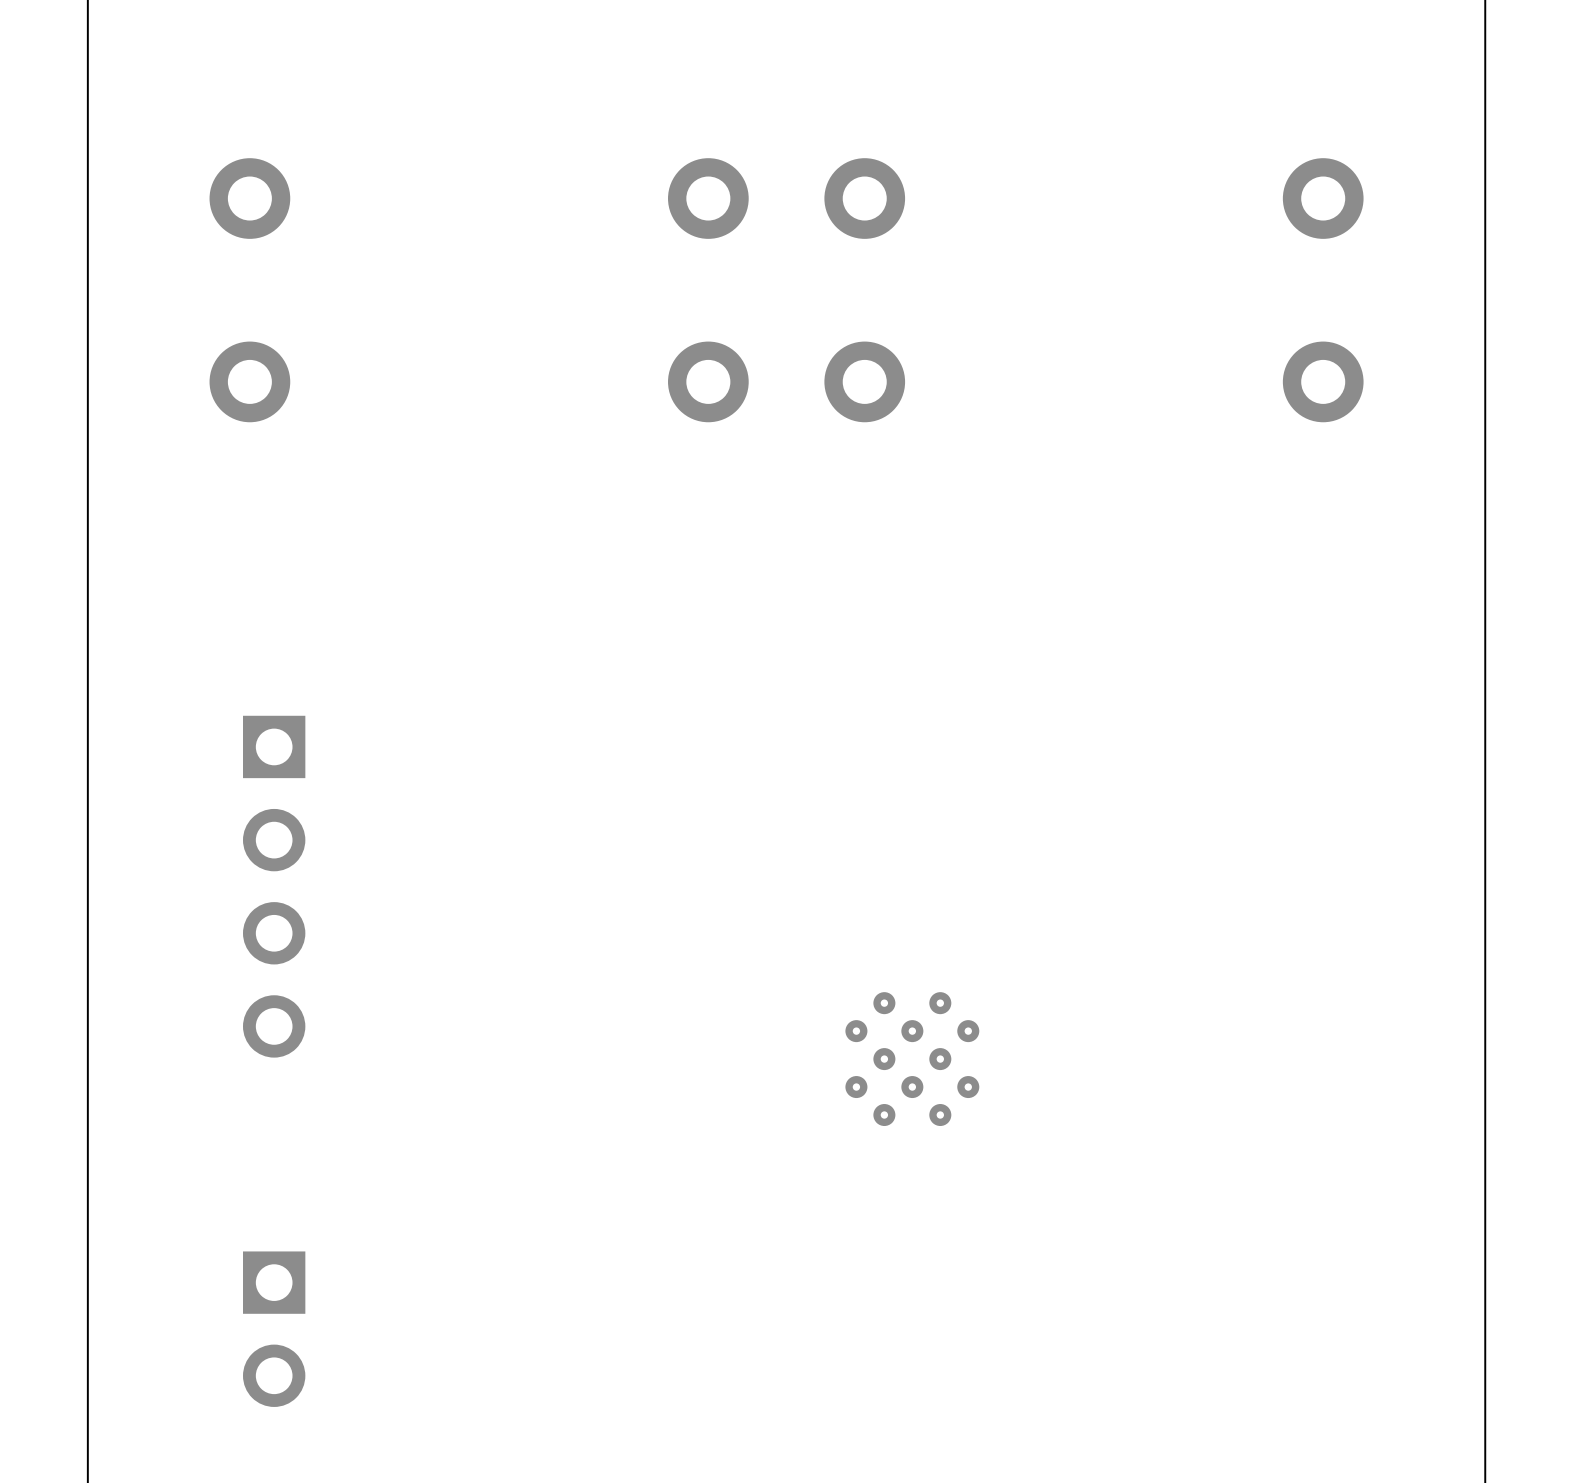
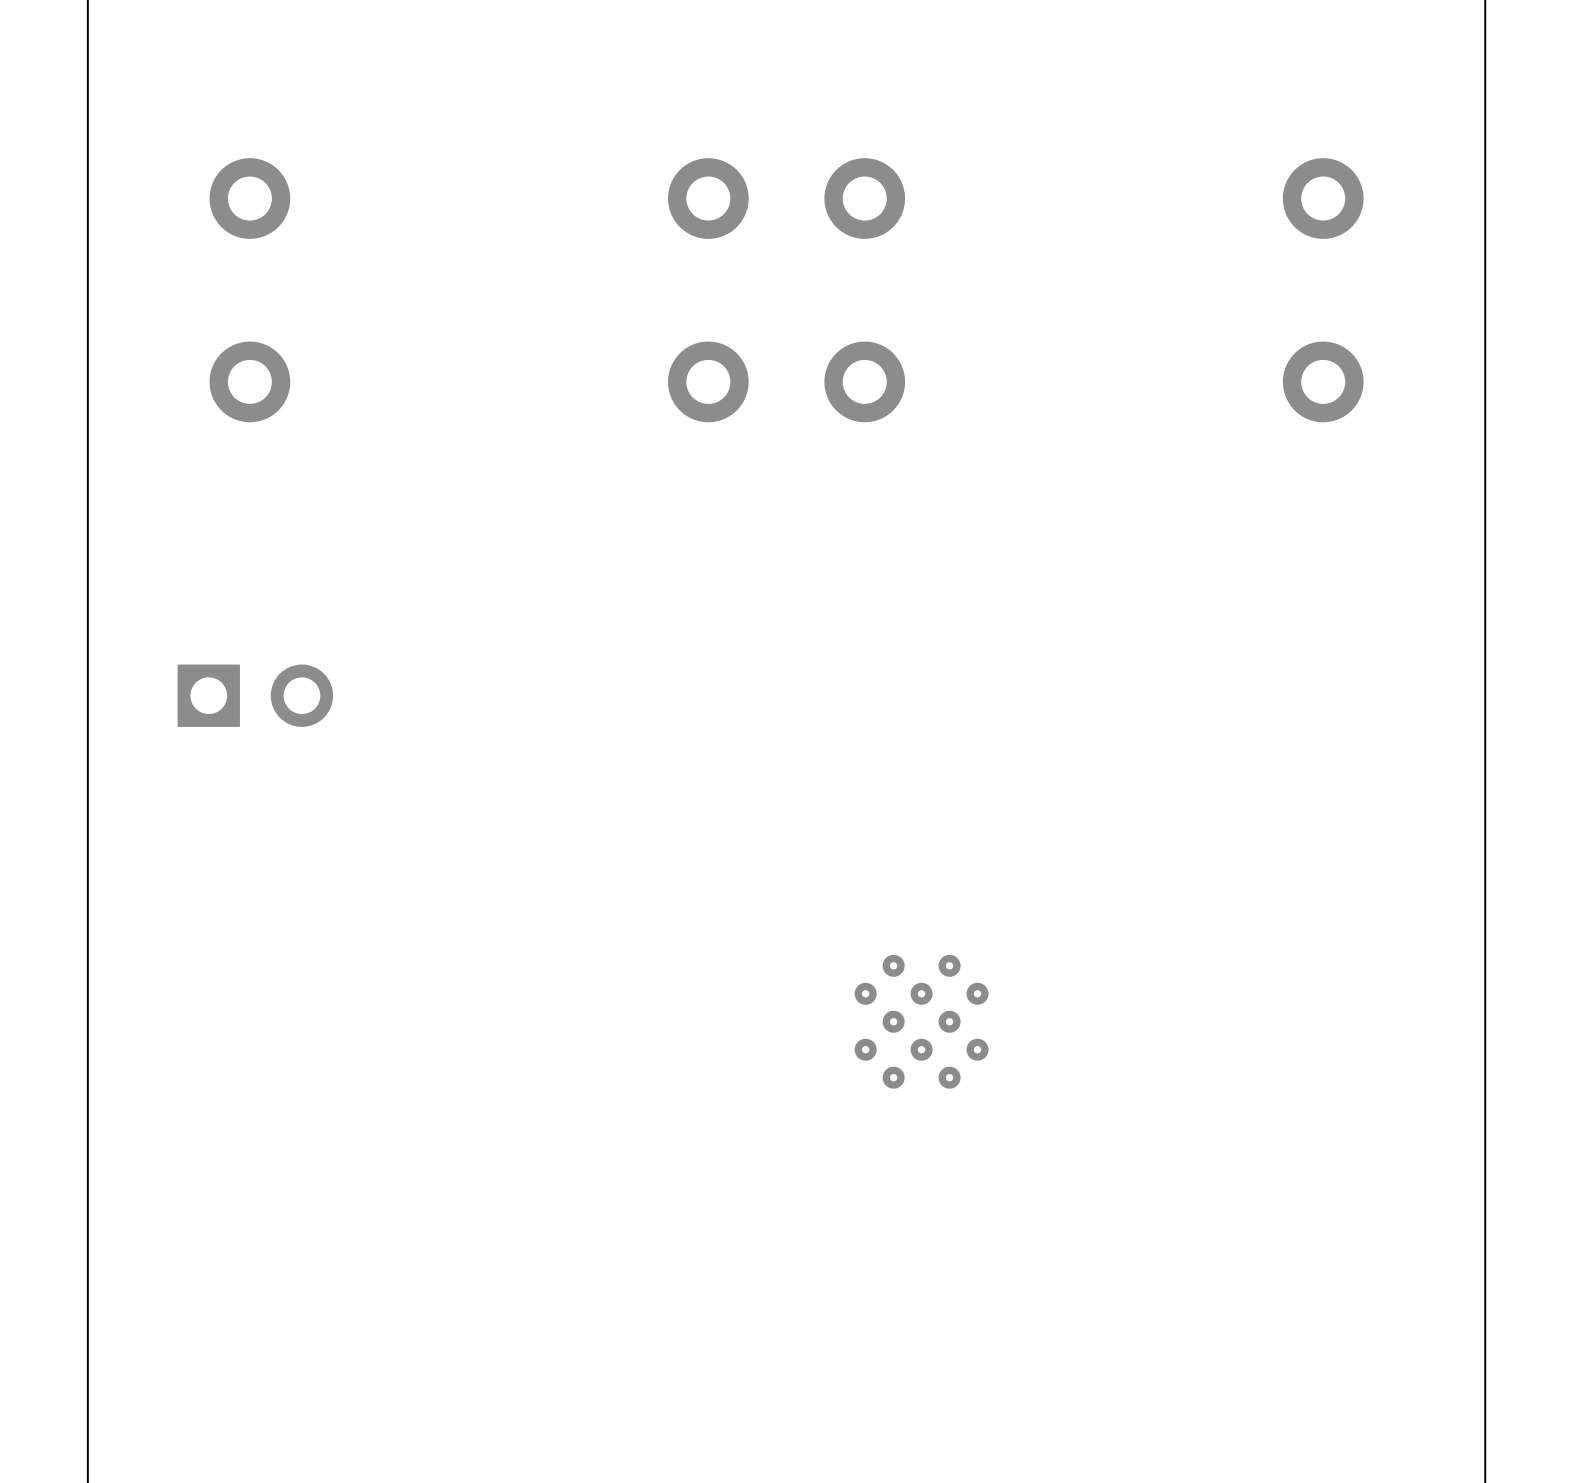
part: (274, 886) -> none
part position: (912, 1059) -> (921, 1021)
part rotation: 0° (274, 1329) -> 90° counterclockwise (255, 695)
part position: (274, 1329) -> (255, 695)

